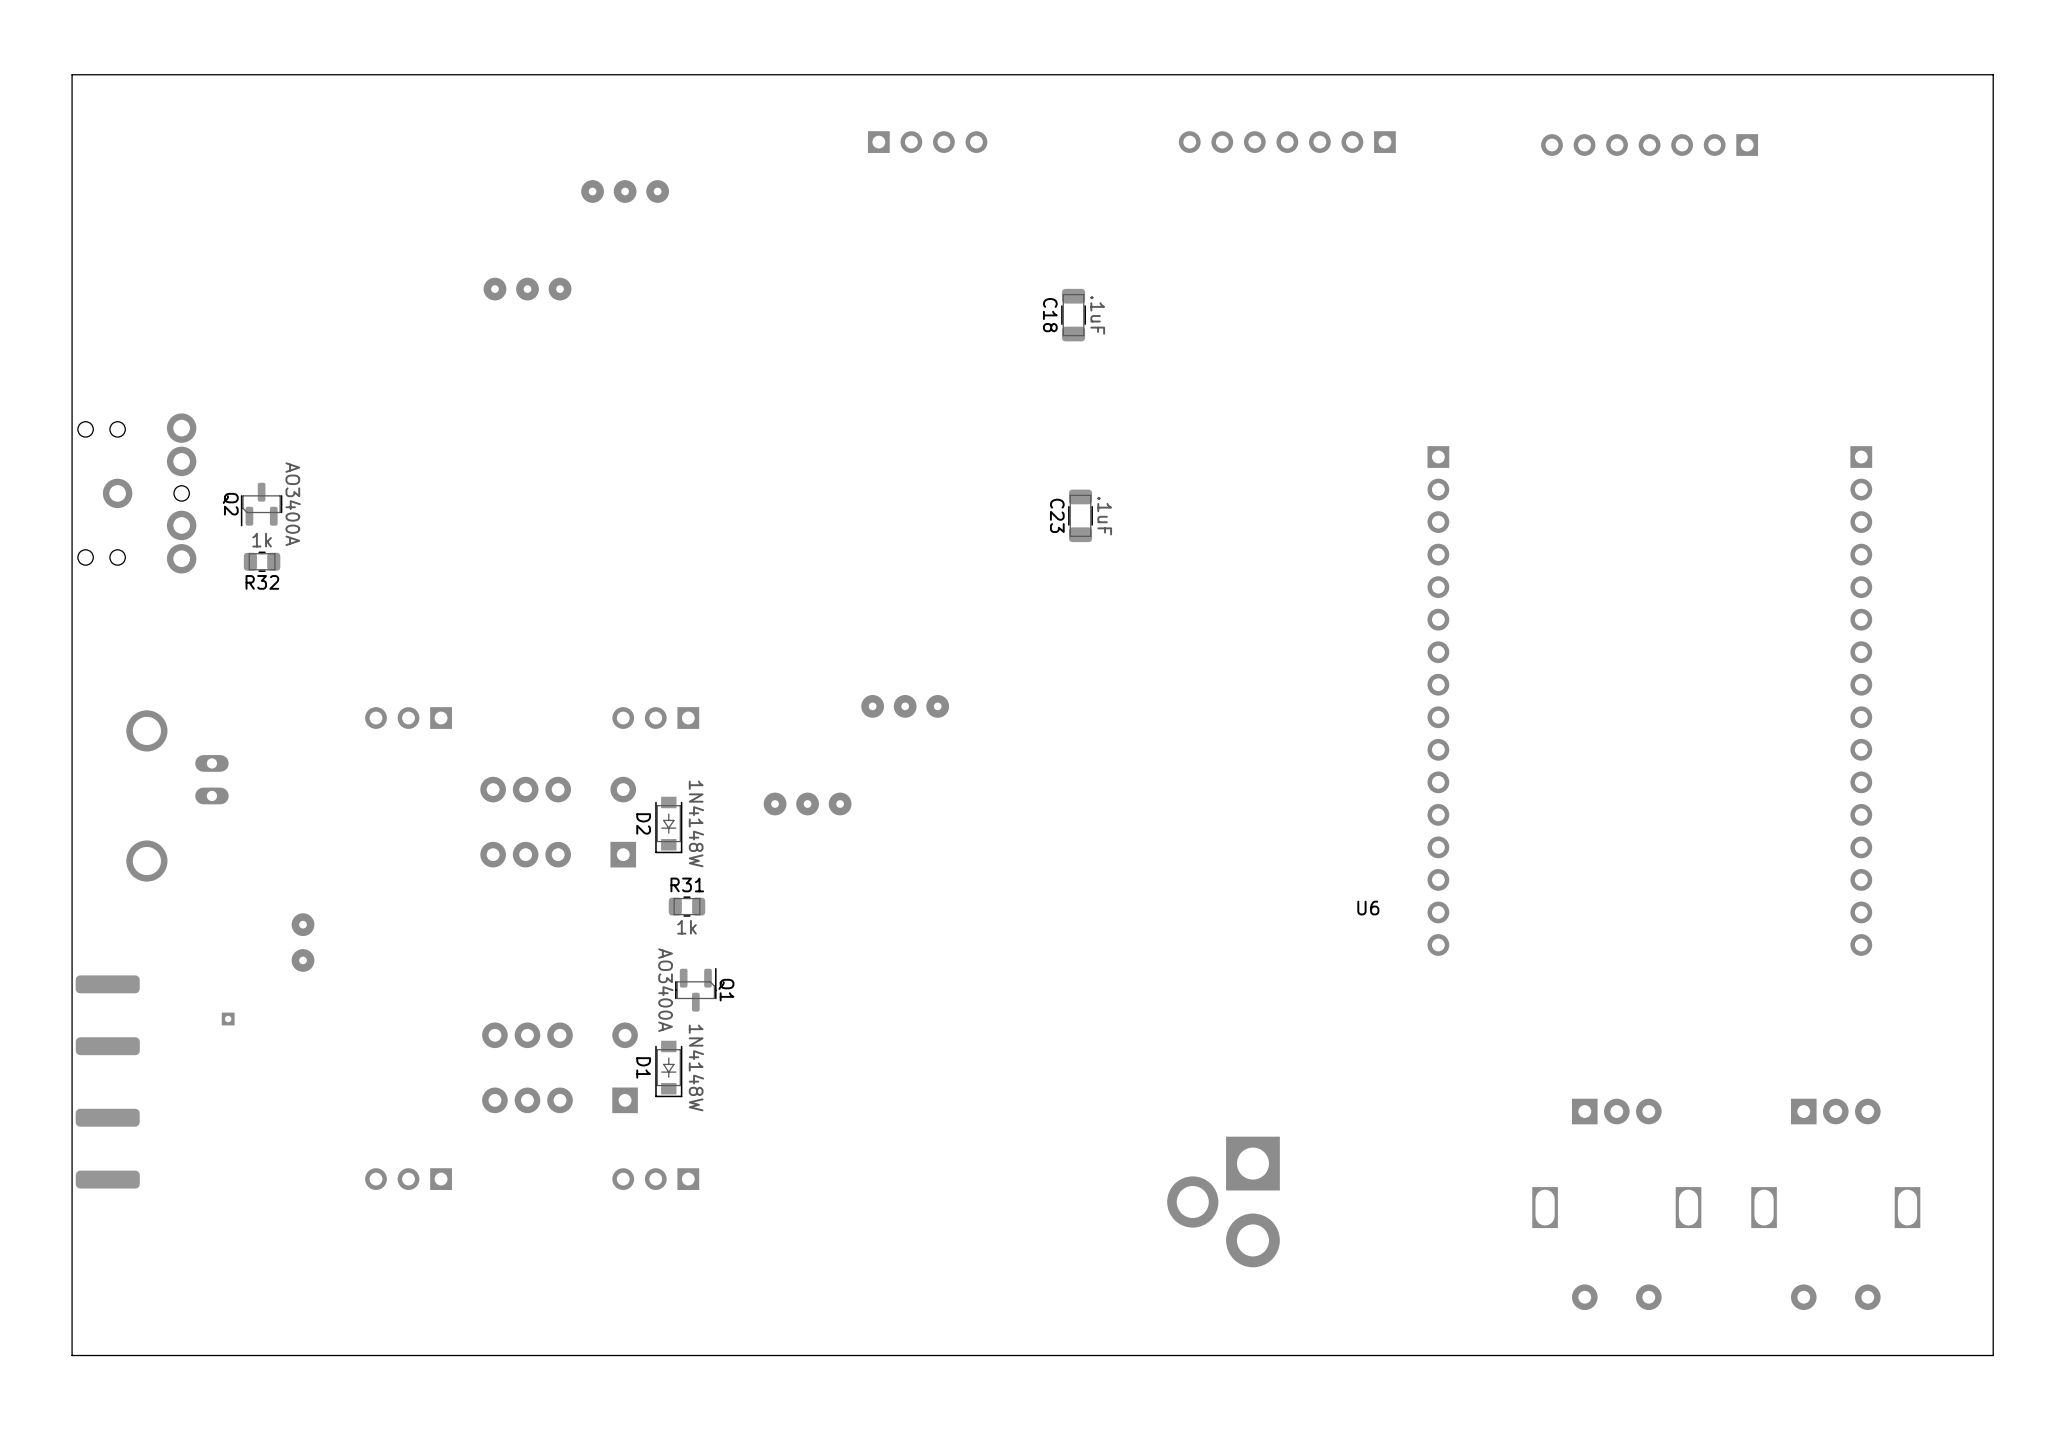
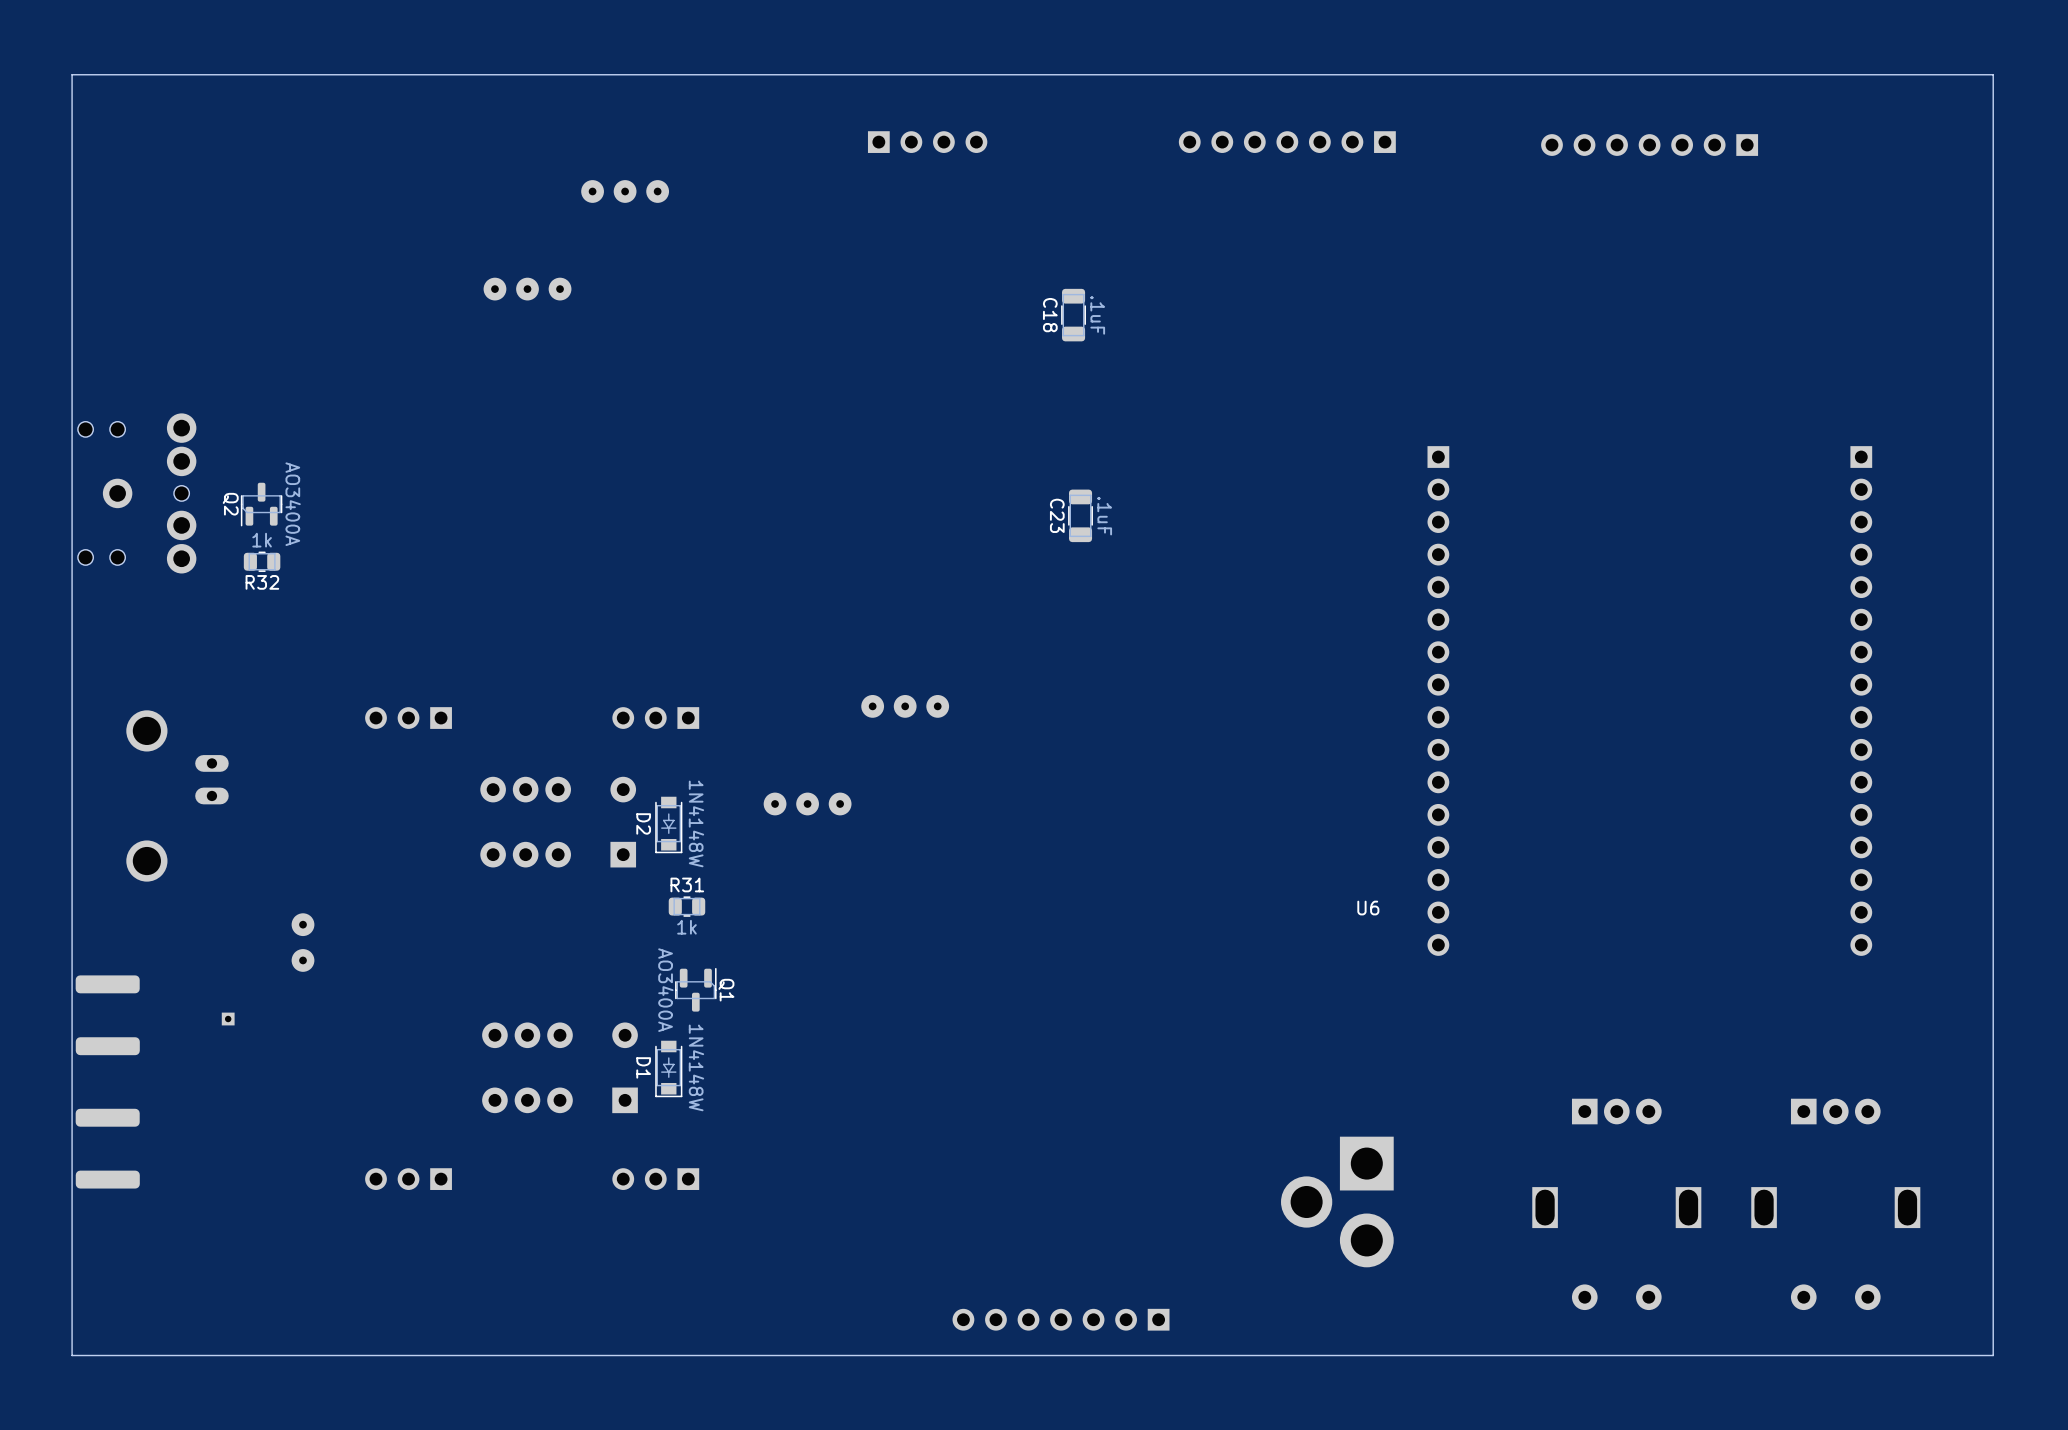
part position: (1223, 1202) -> (1337, 1202)
part: none -> (1061, 1319)

